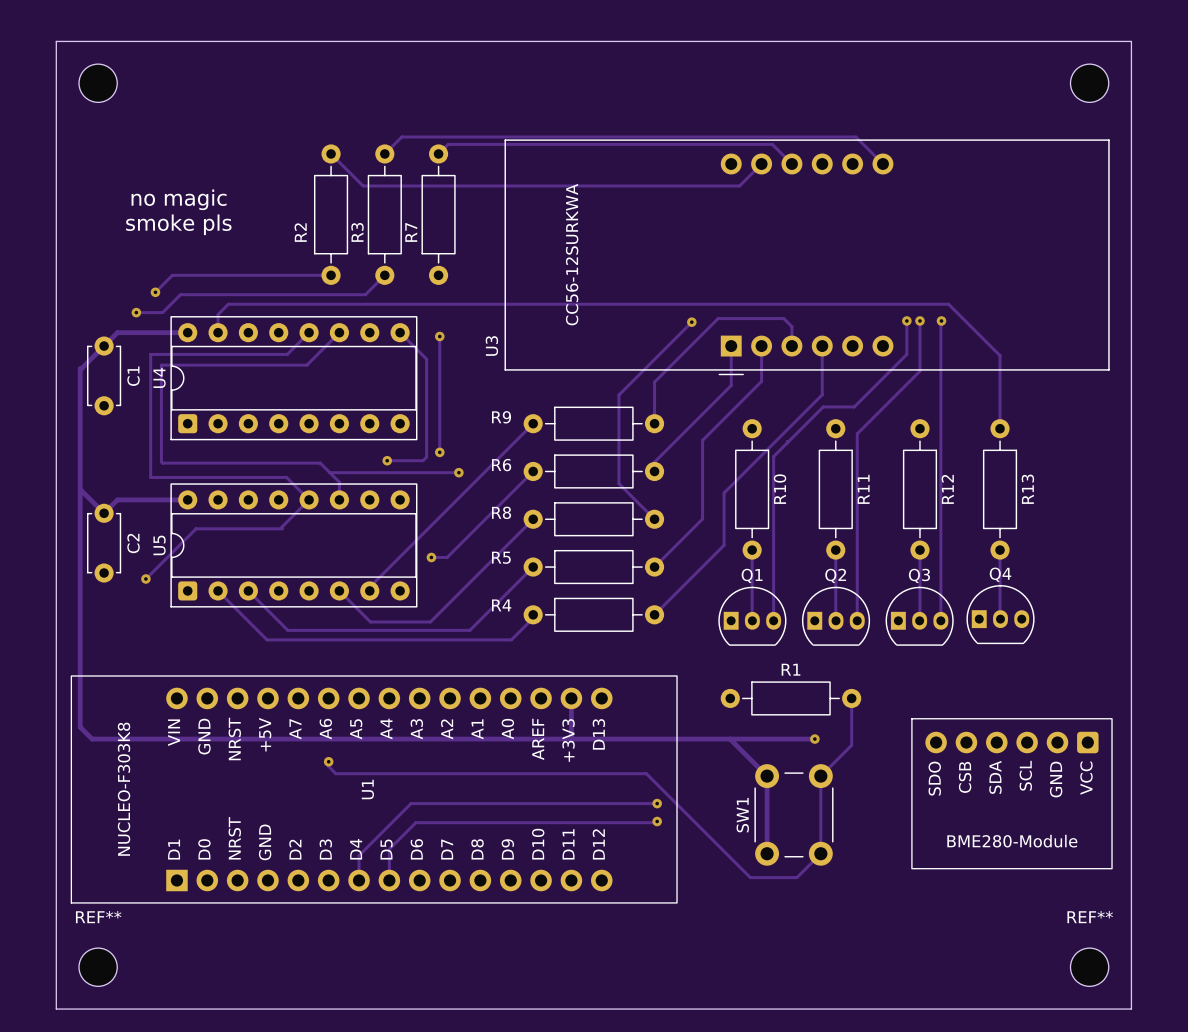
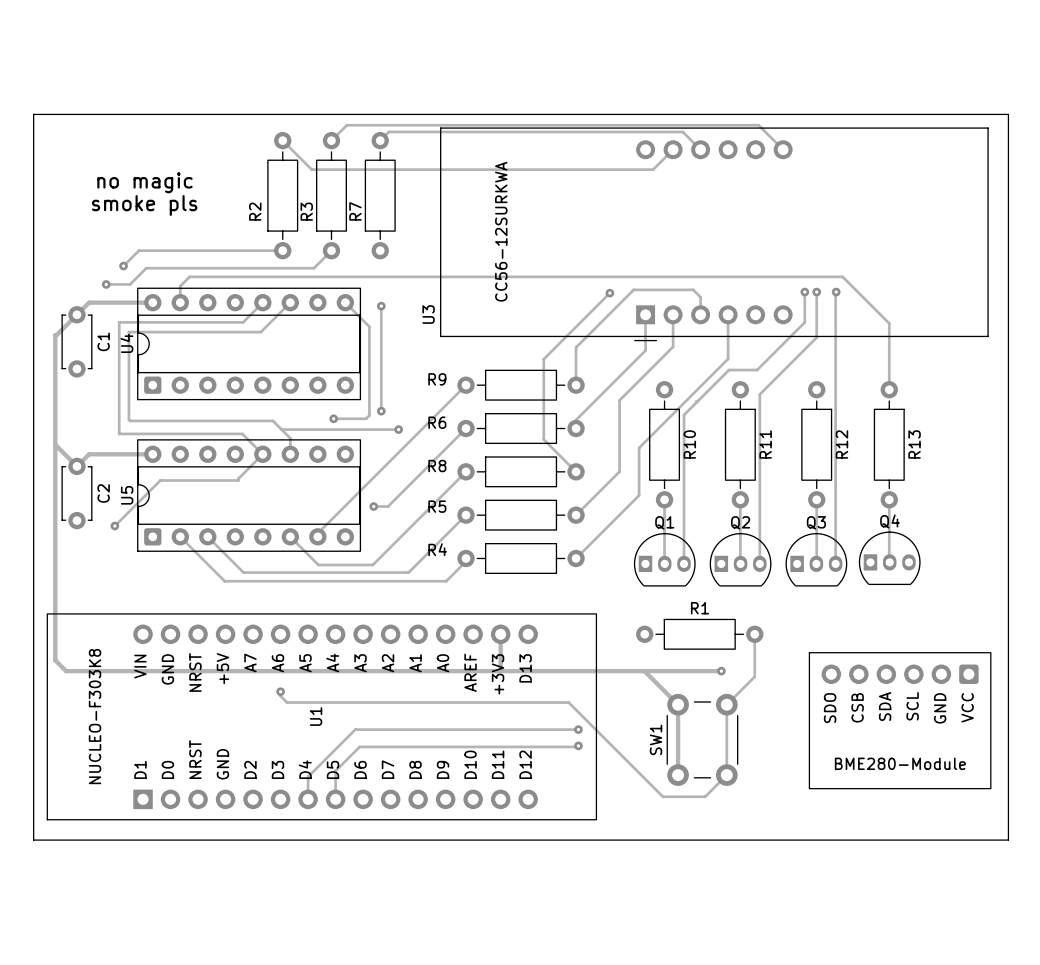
part: (98, 83) -> none
part: (1089, 83) -> none
board edge: (56, 125) (56, 41) (1131, 41) (1131, 125) -> (33, 114) (1008, 114)
board edge: (56, 925) (56, 1009) (1131, 1009) (1131, 925) -> (33, 840) (1008, 840)
REF**: (98, 967) -> none
REF**: (1089, 967) -> none

